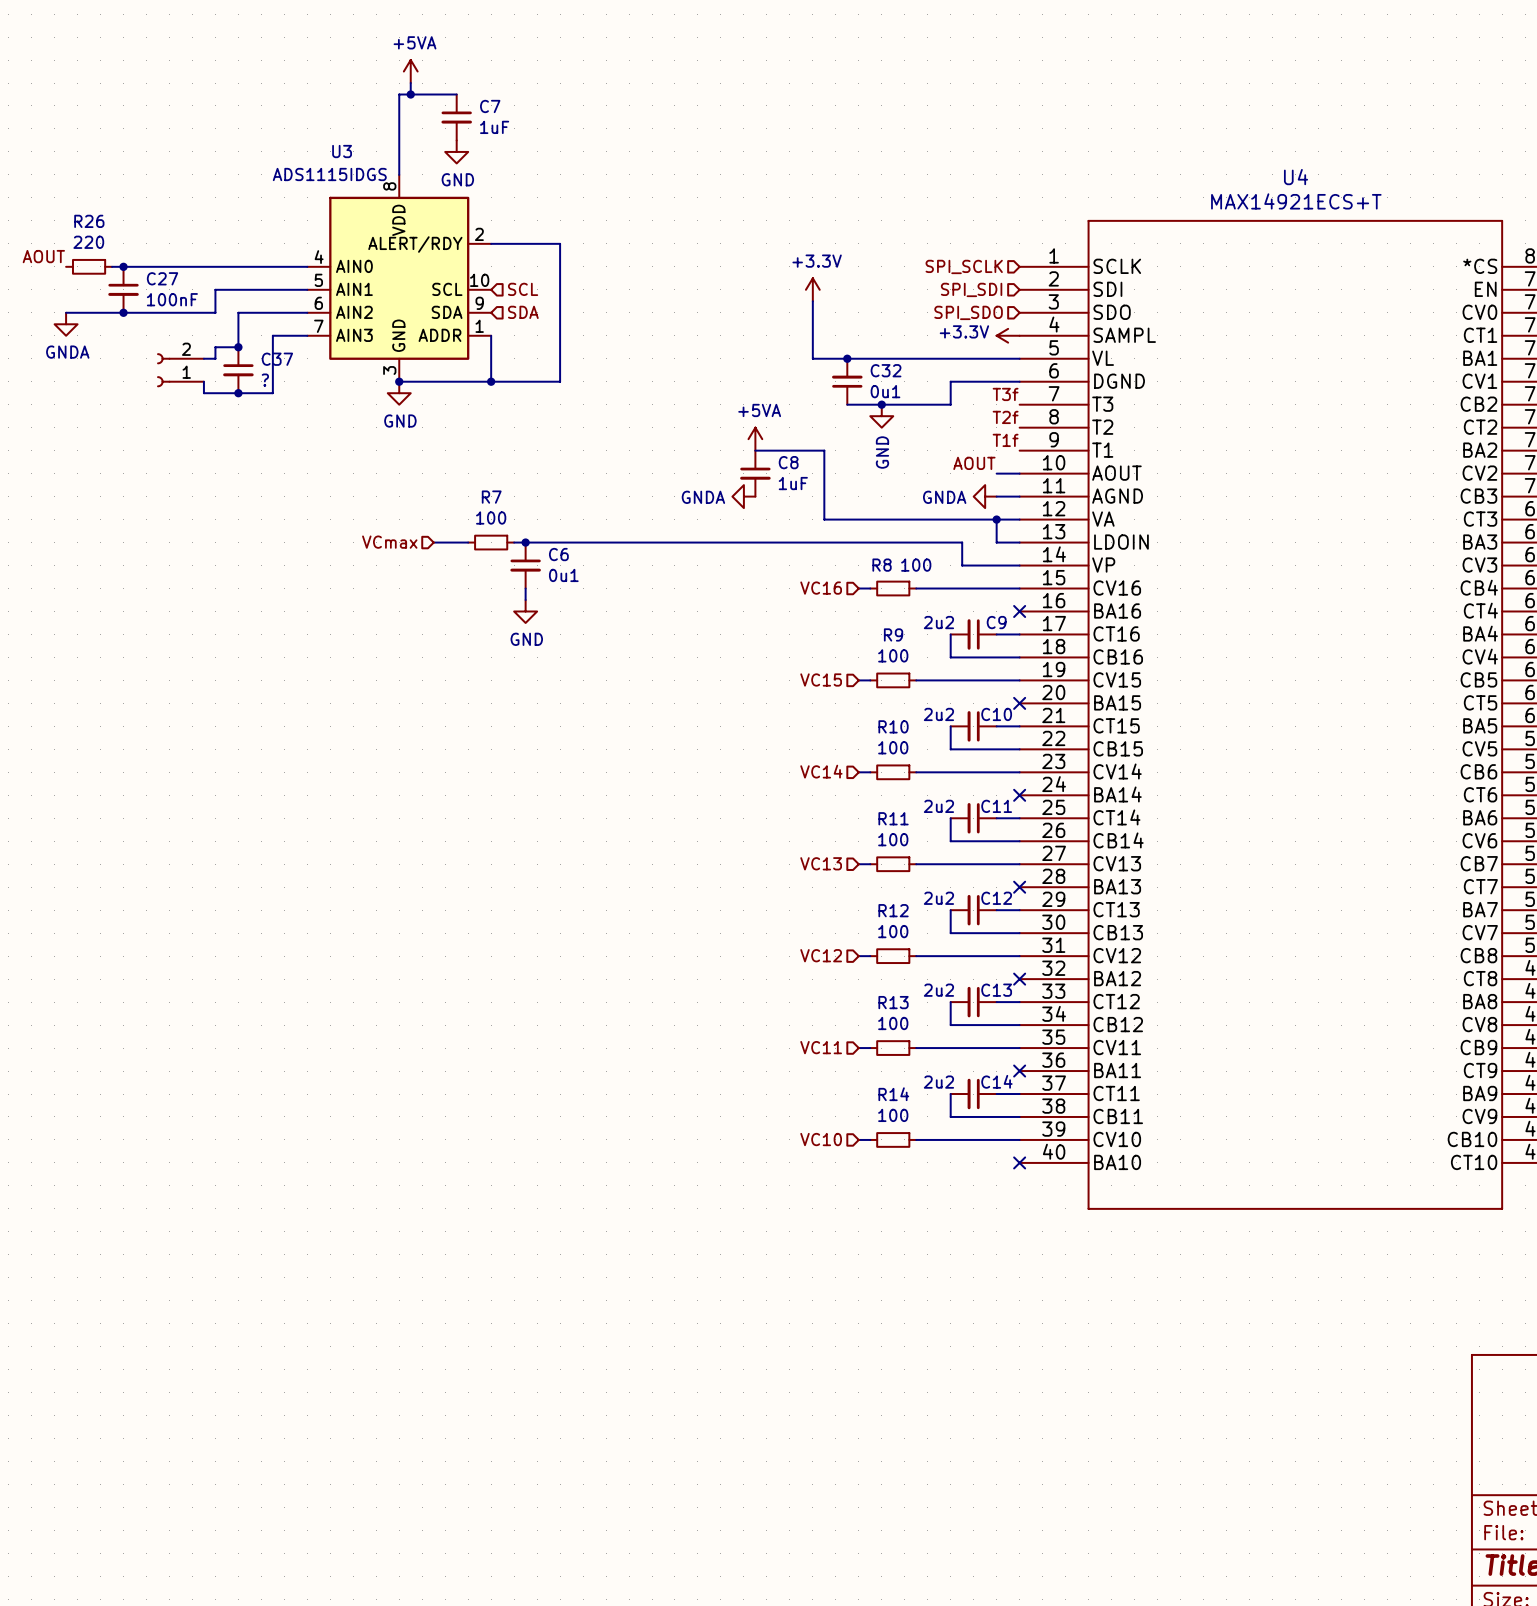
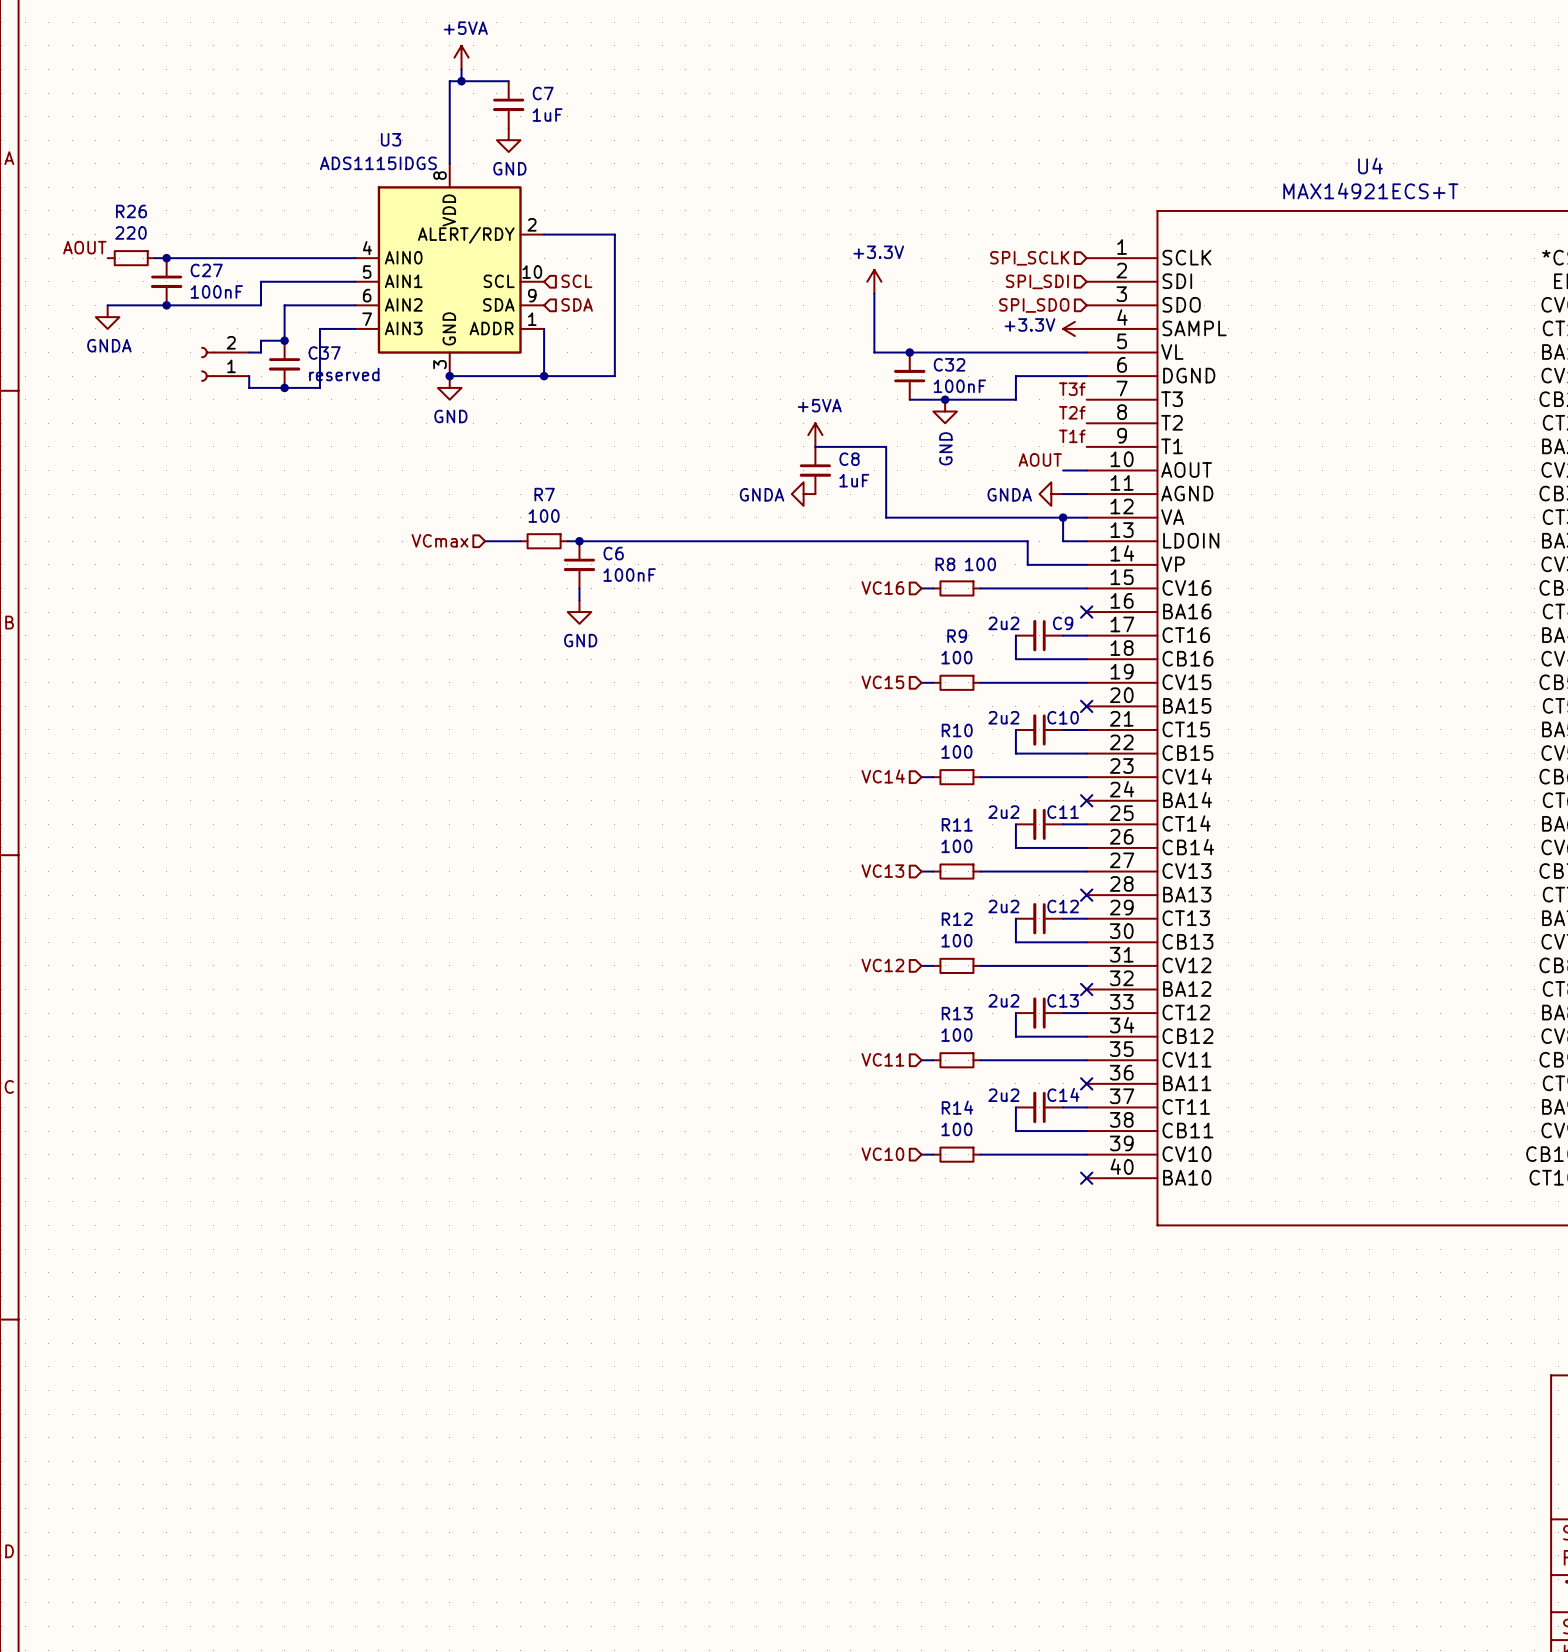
C37 value: ? (265, 380) -> reserved (344, 374)
C32 value: 0u1 (885, 391) -> 100nF (959, 386)
C6 value: 0u1 (563, 575) -> 100nF (629, 575)

